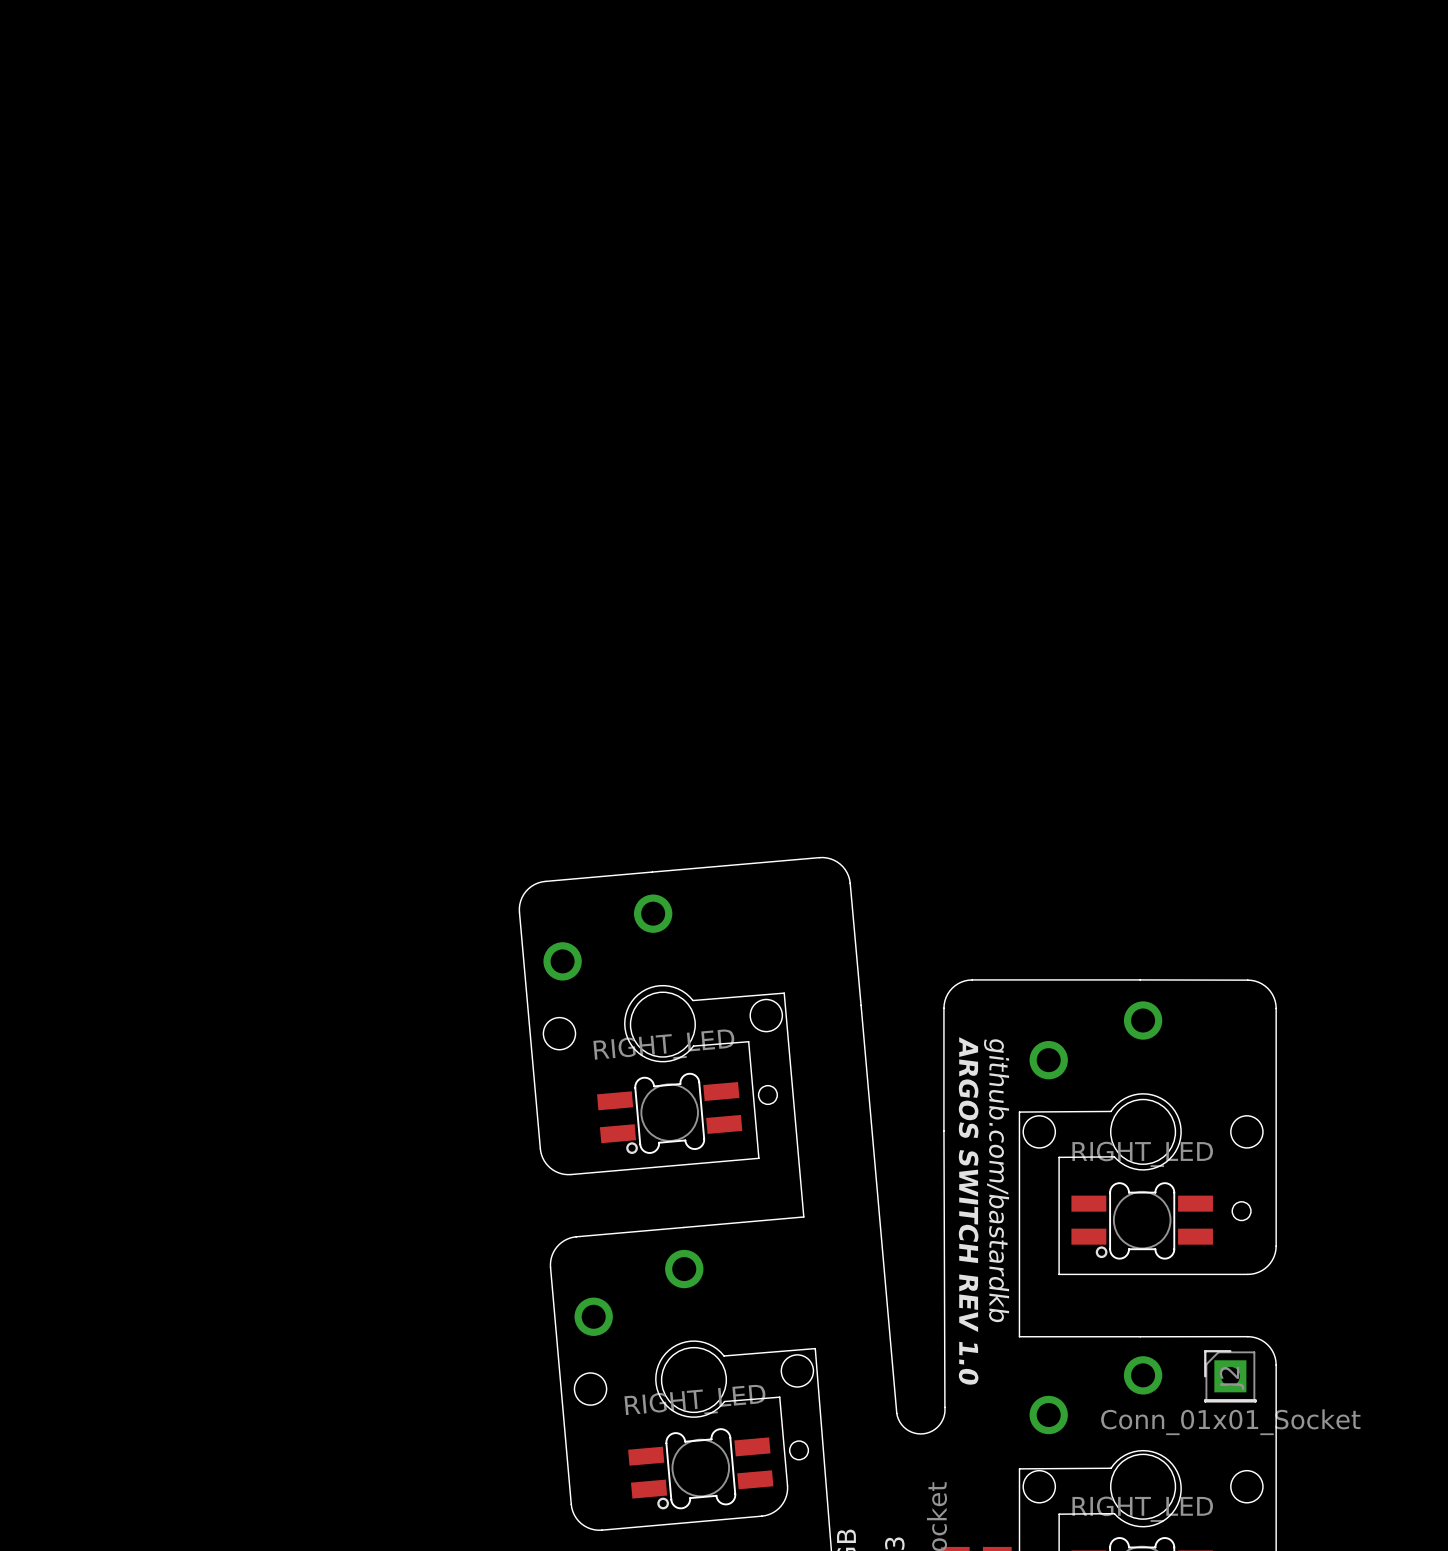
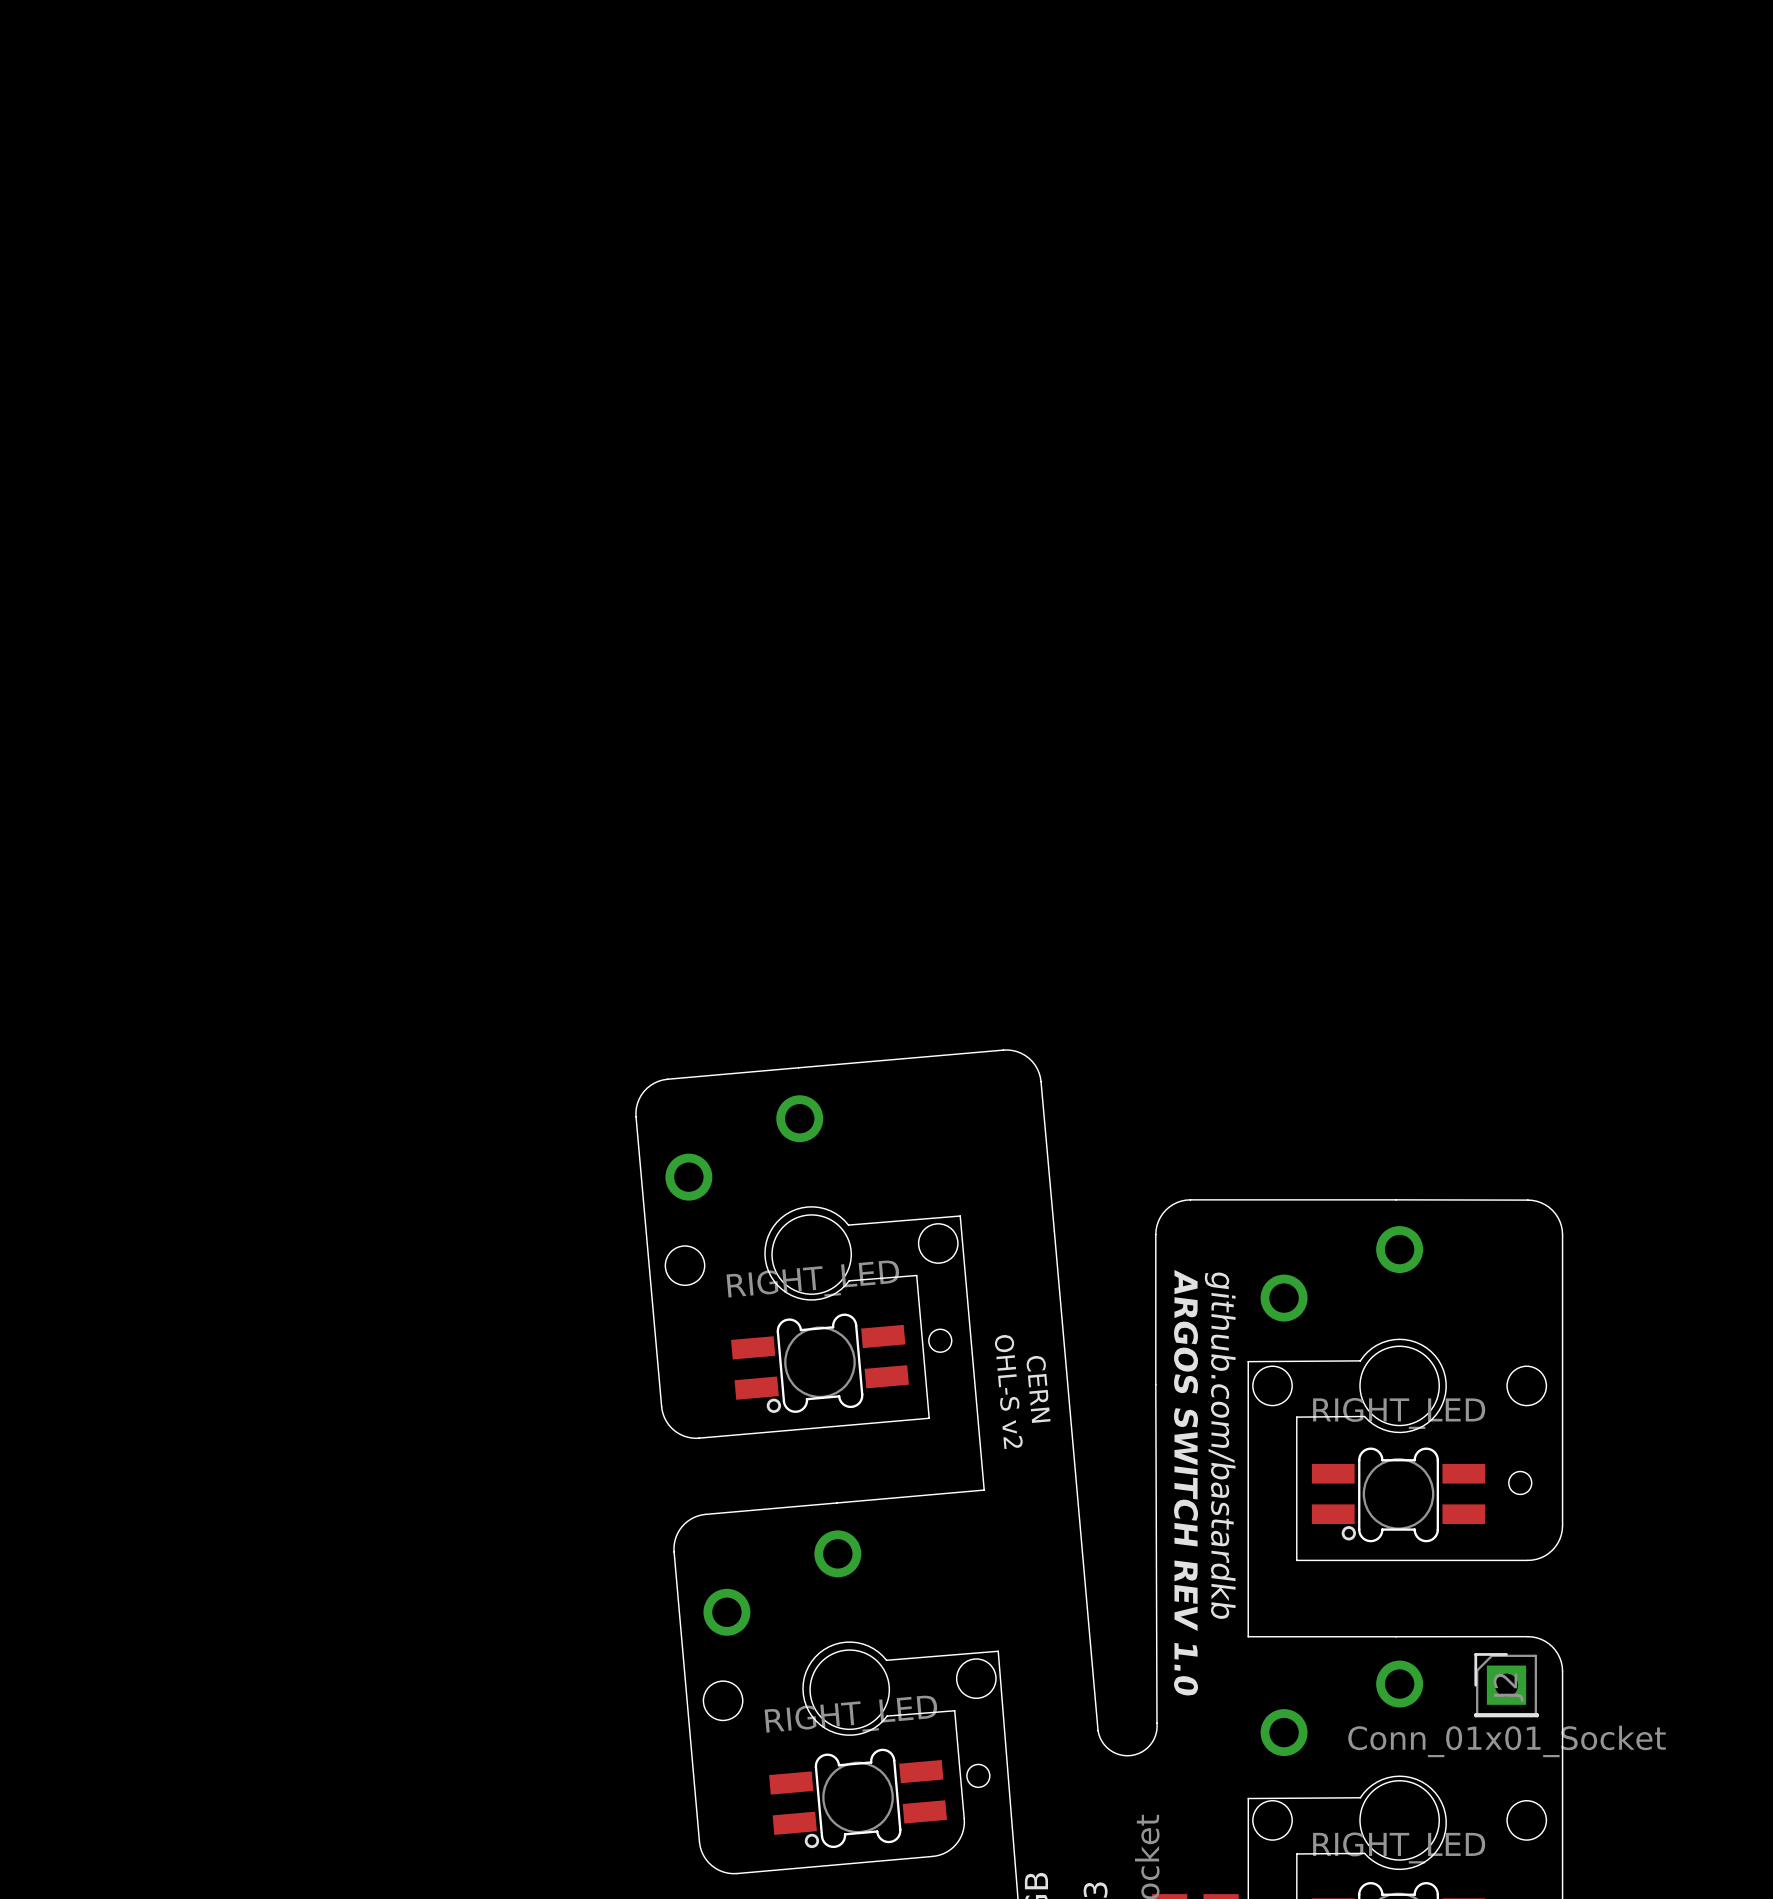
text: none -> CERN (1038, 1389)
text: none -> OHL-S v2 (1008, 1391)

